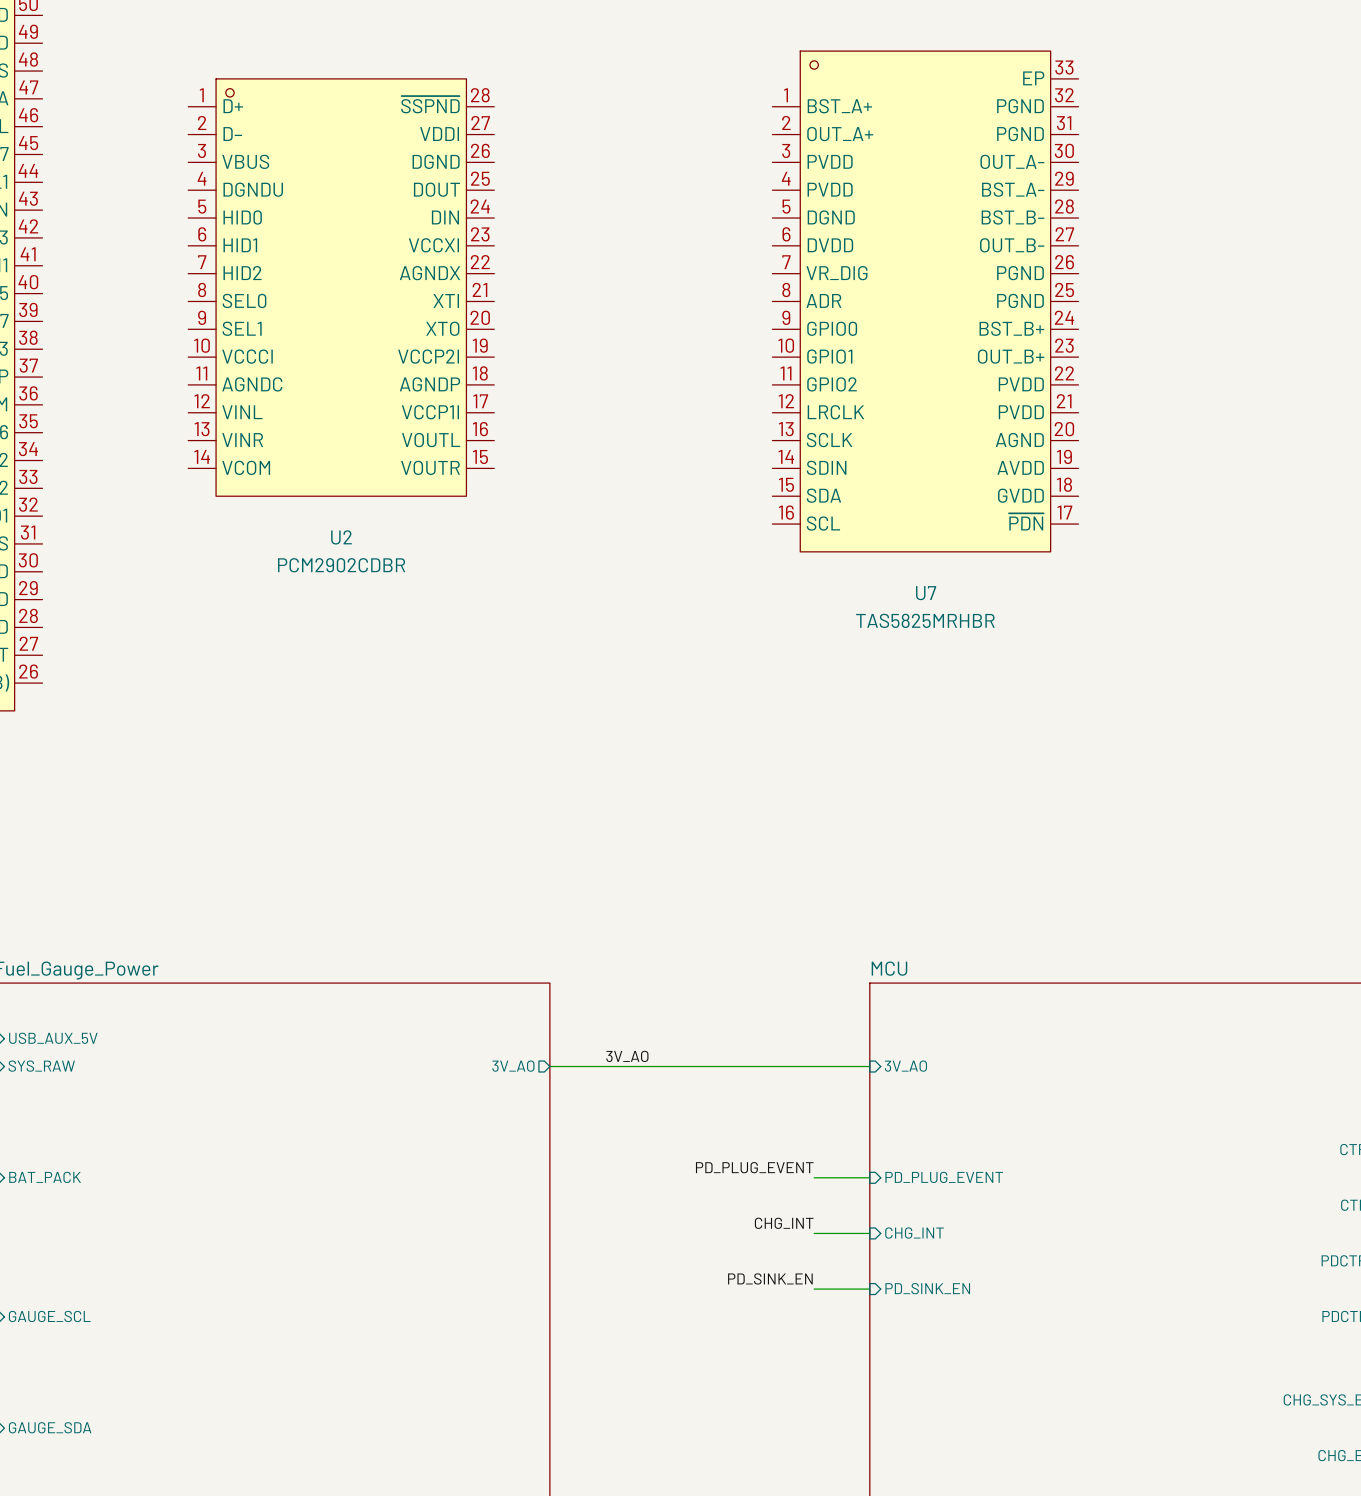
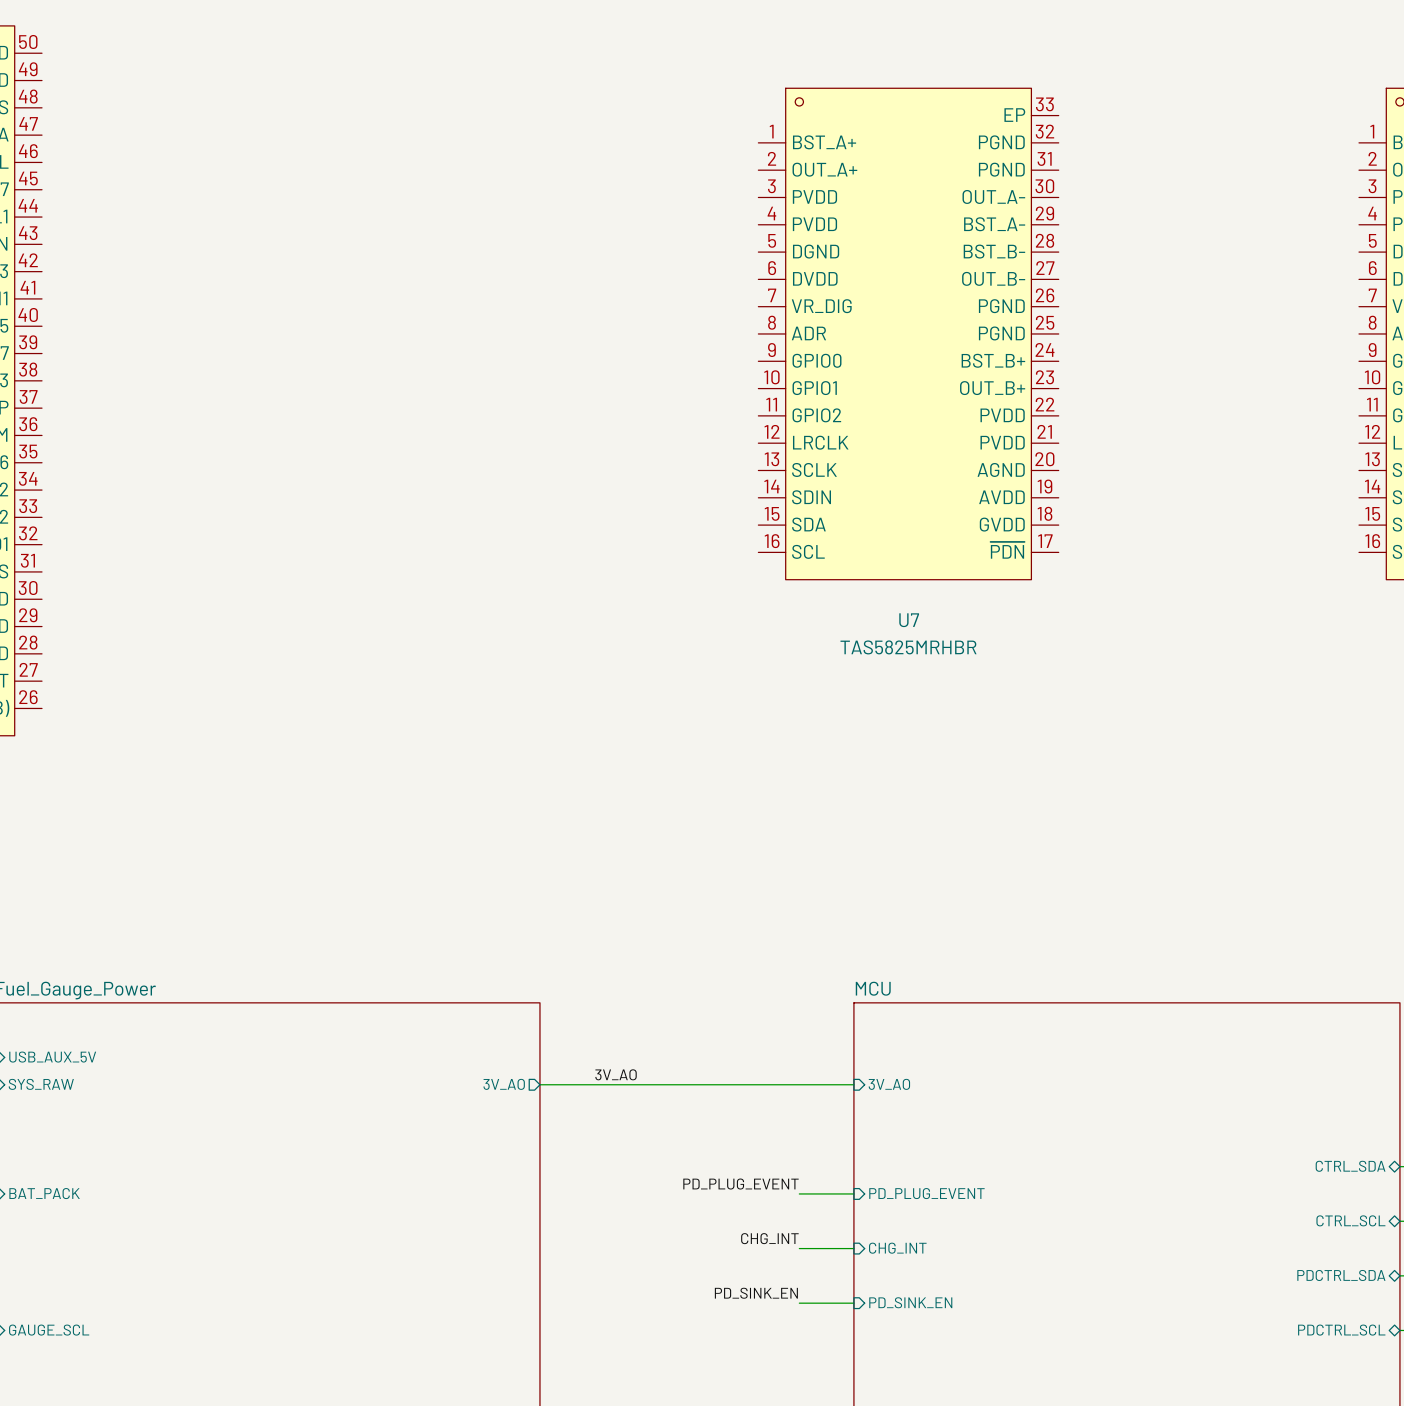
U2: PCM2902CDBR (341, 287) -> none

